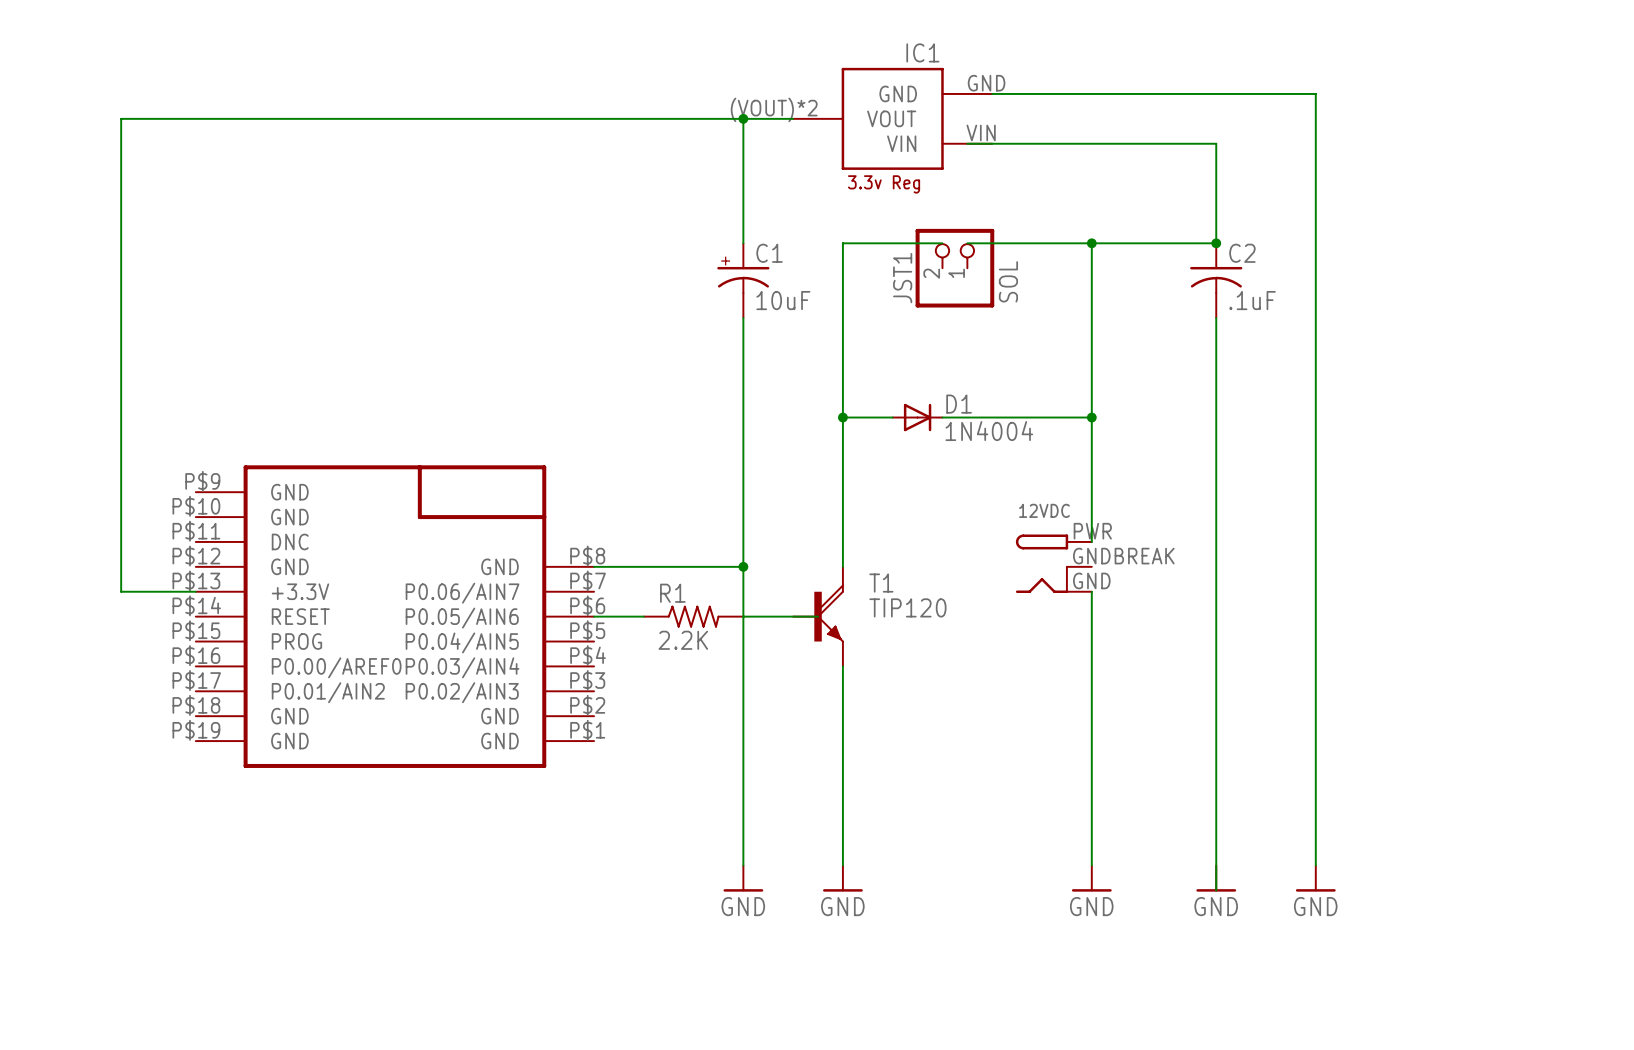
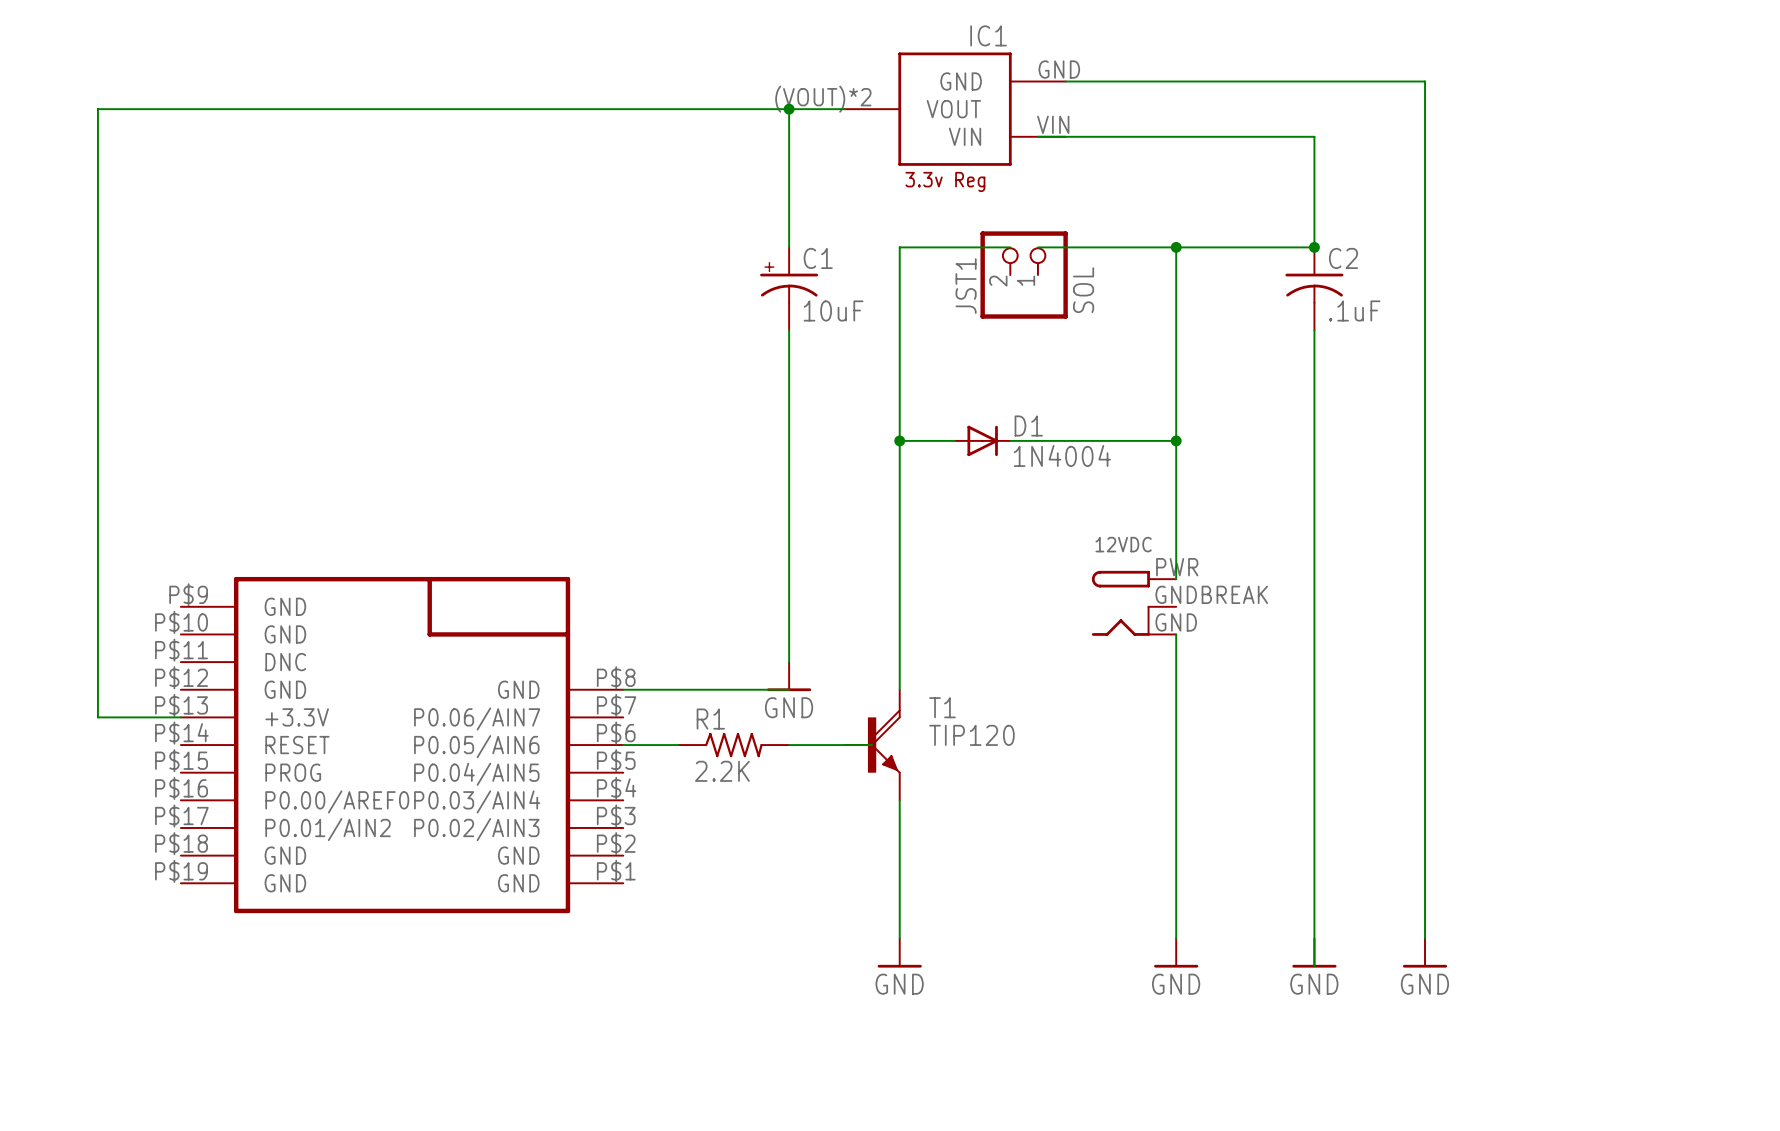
wire: (594, 566) (743, 566) -> (623, 689) (789, 689)
junction: (743, 566) -> none
wire: (121, 591) (195, 591) -> (97, 634) (97, 717) (180, 717)
part position: (394, 616) -> (402, 745)
wire: (594, 616) (643, 616) -> (623, 745) (678, 745)
R1 position: (693, 616) -> (733, 745)
wire: (818, 616) (743, 616) (743, 865) -> none
T1 position: (818, 616) -> (872, 745)
power symbol: none -> GND (789, 676)
wire: (842, 666) (842, 741) -> (899, 606) (899, 689)
wire: none -> (789, 745) (872, 745)
power symbol: GND (743, 878) -> none

